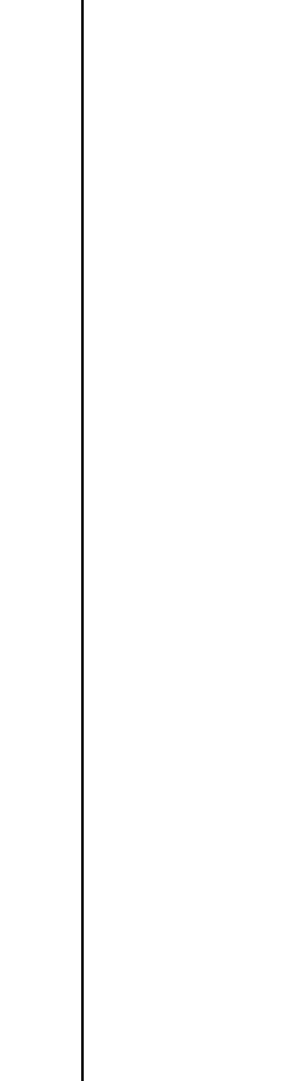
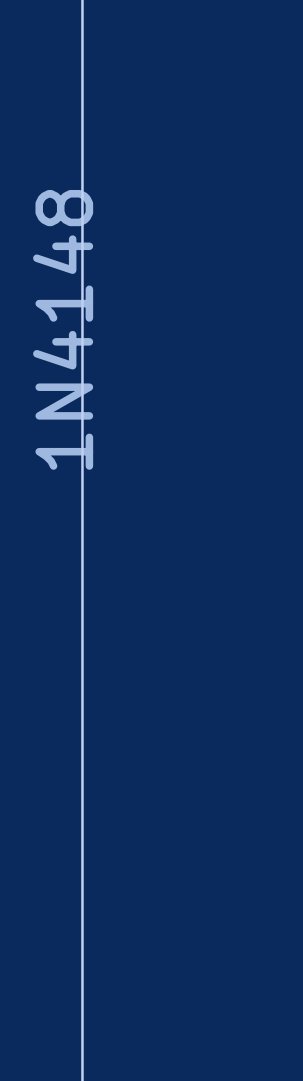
part value: none -> 1N4148 (63, 329)

